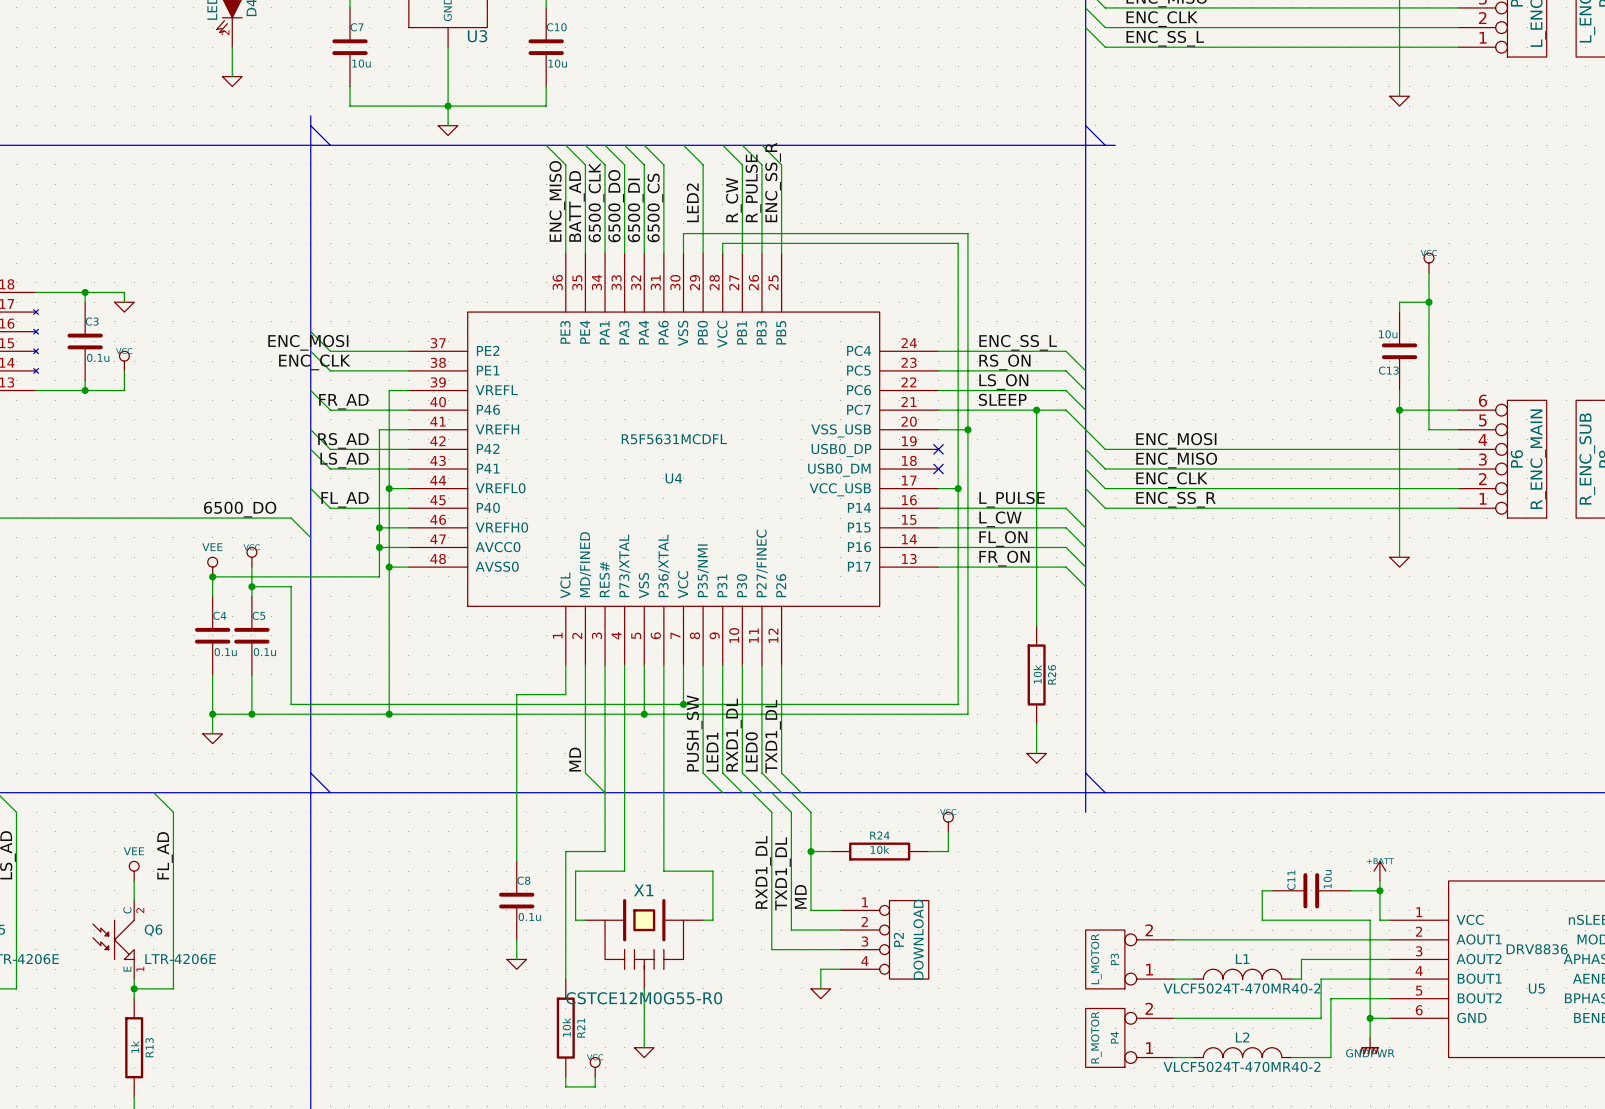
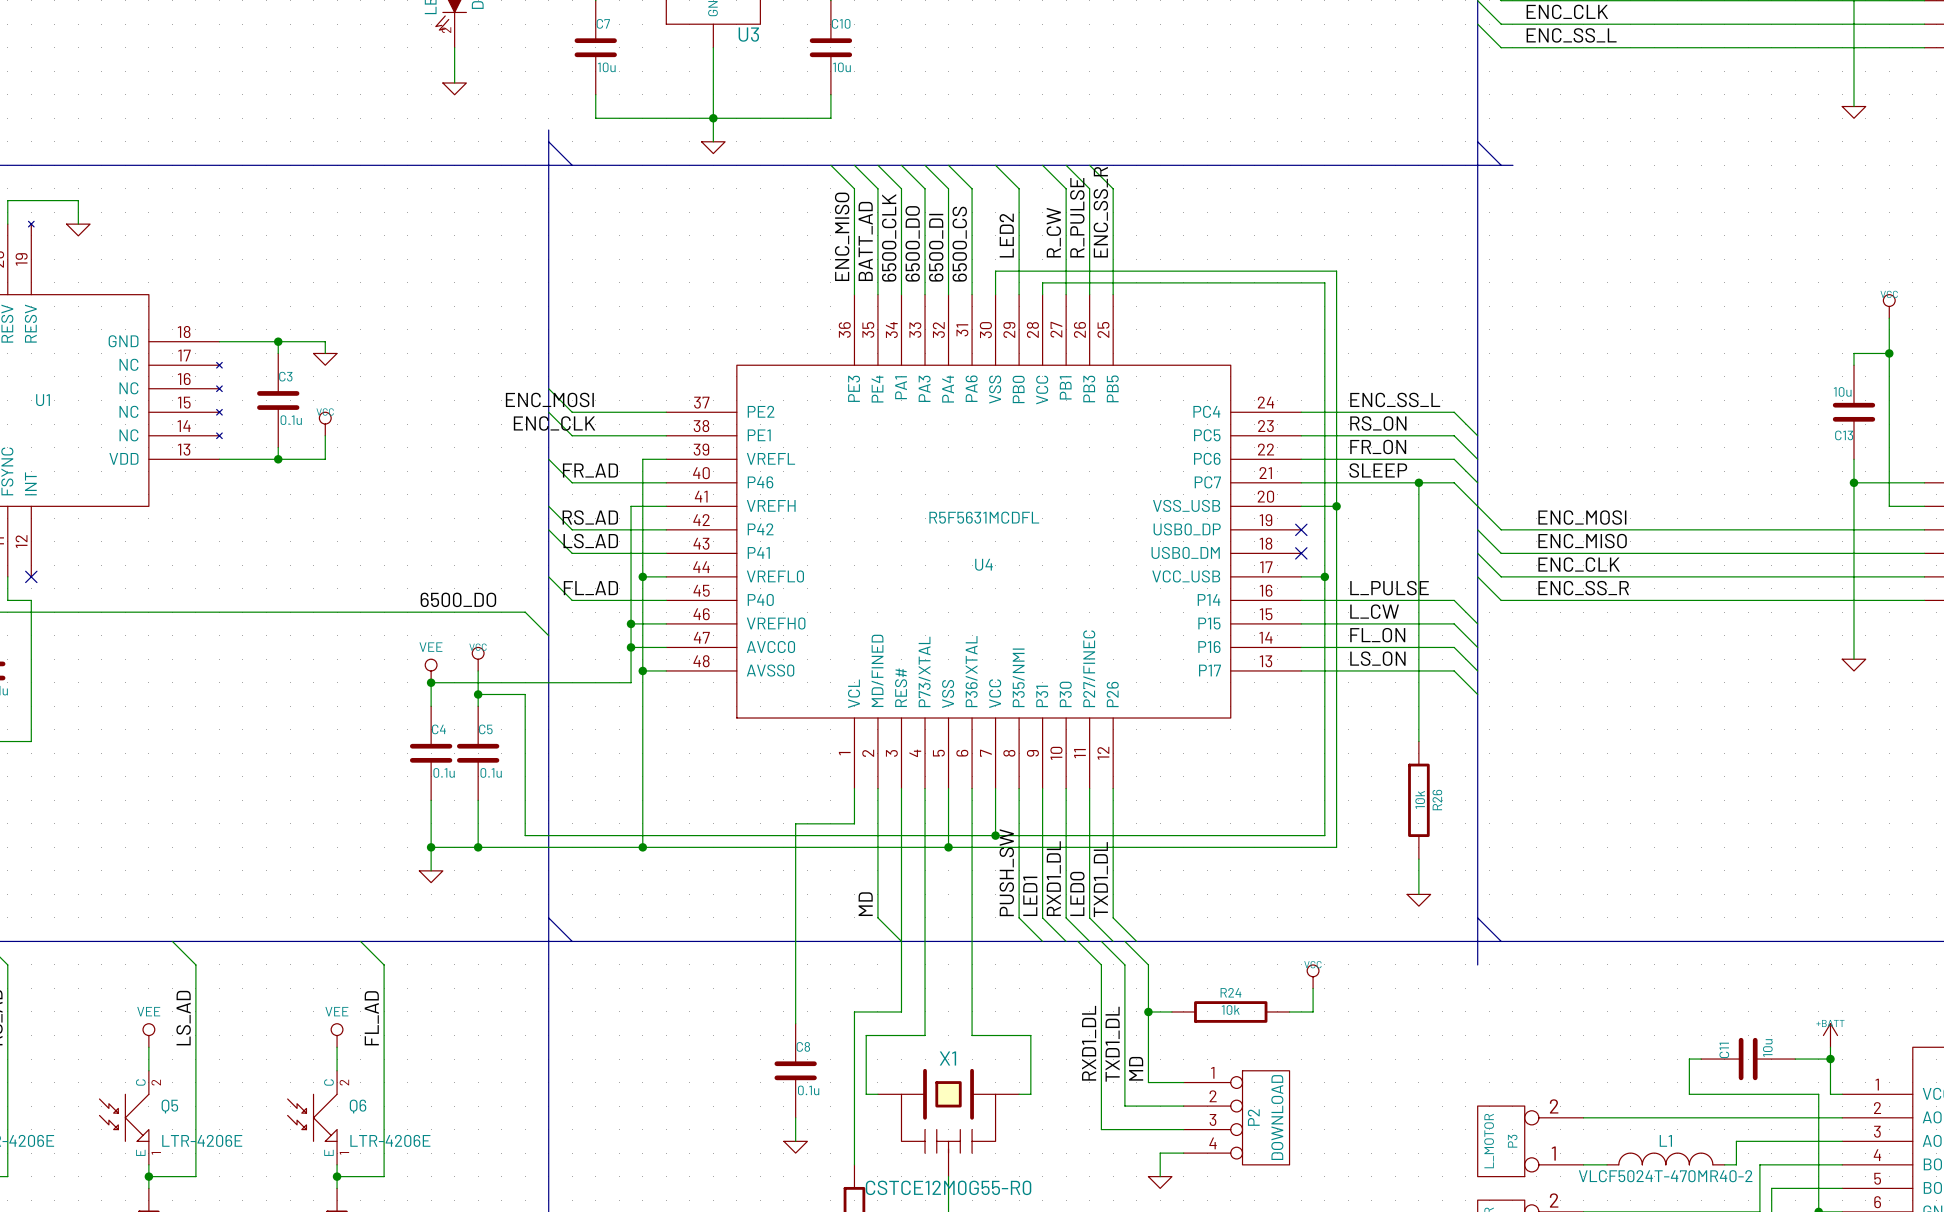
label: LS_ON (1003, 382) -> FR_ON (1378, 446)
label: FR_ON (1004, 558) -> LS_ON (1377, 658)

